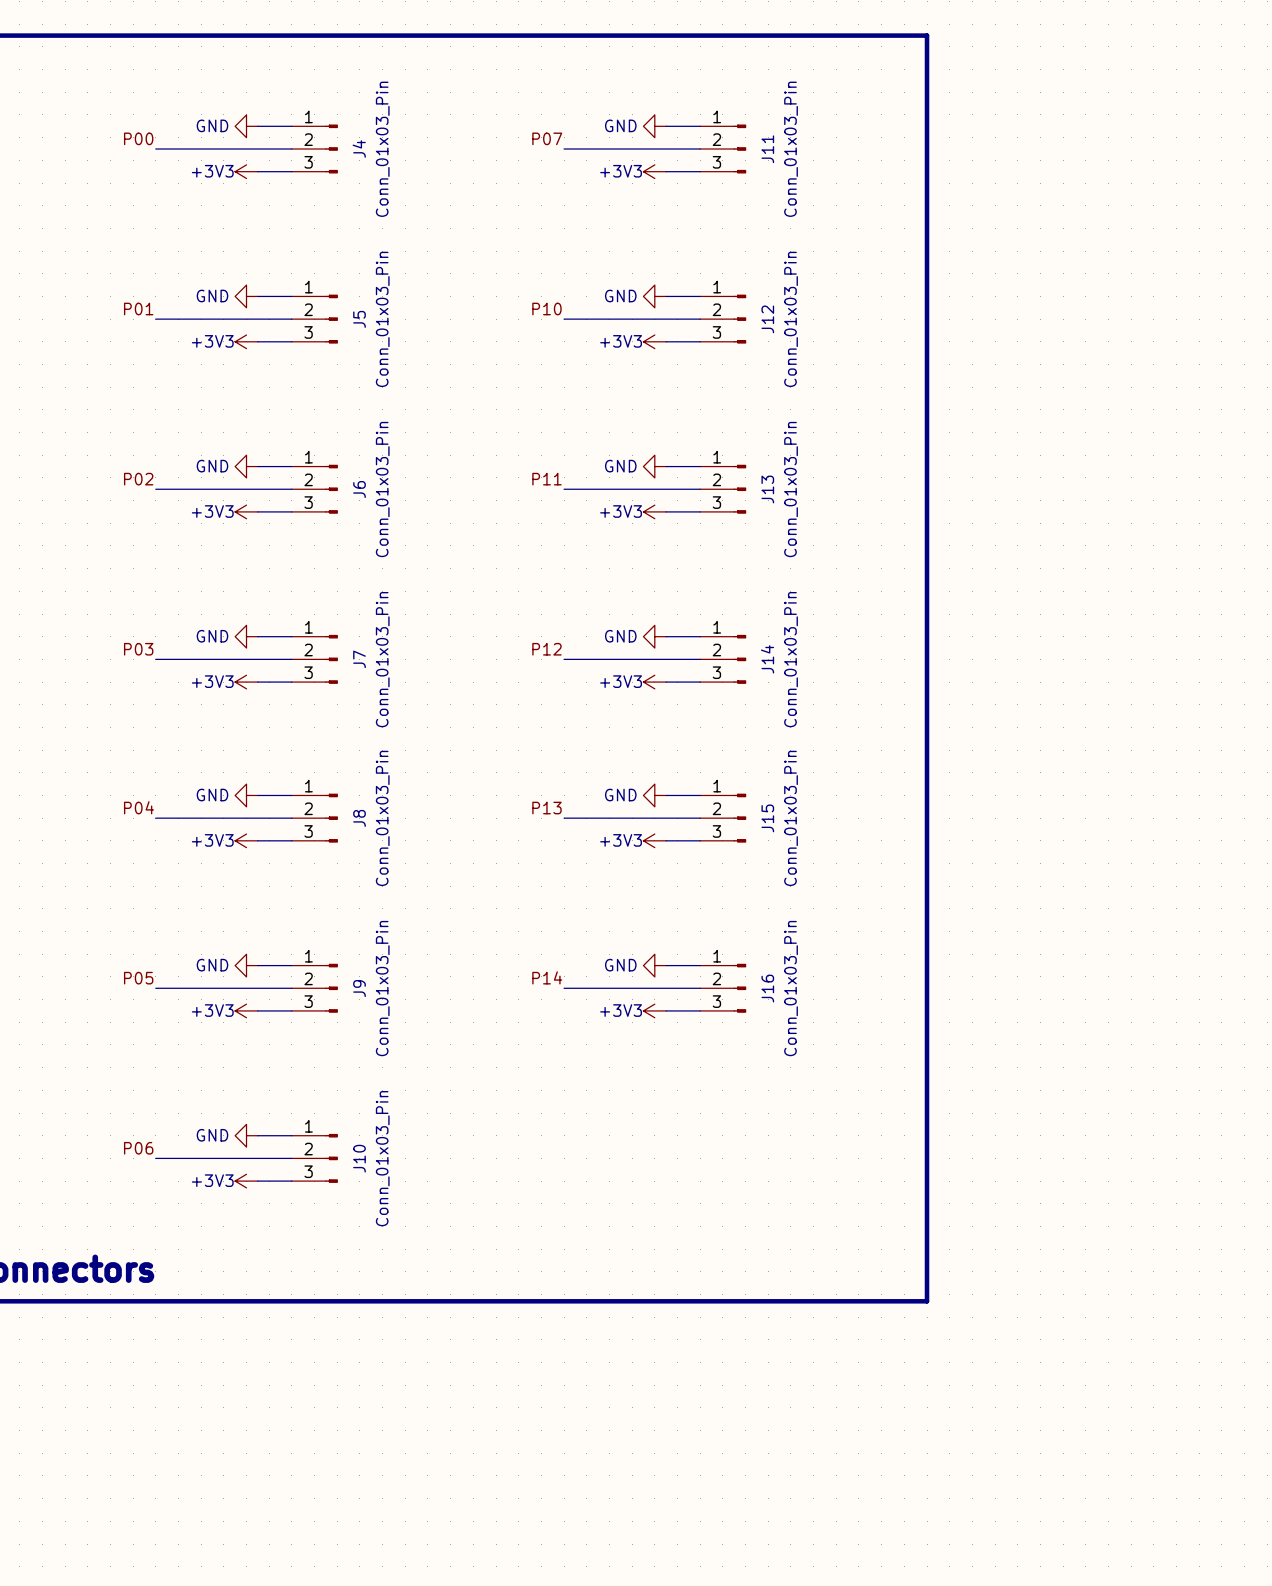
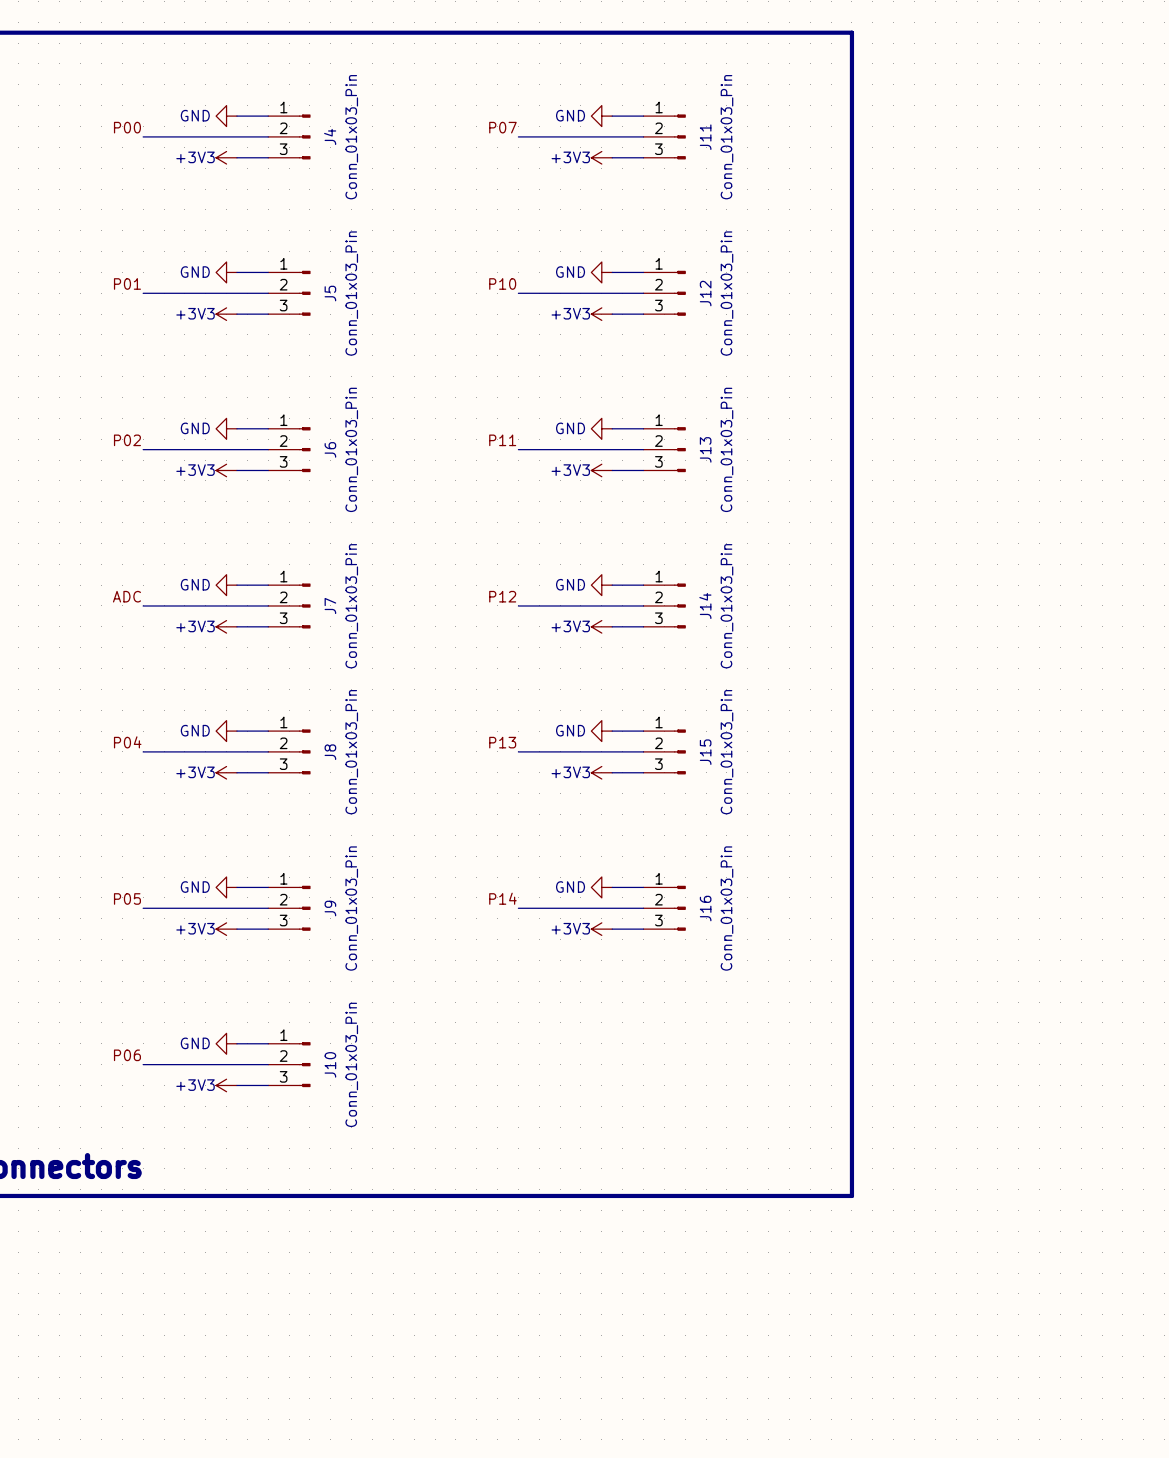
label: P03 (138, 649) -> ADC (126, 596)

